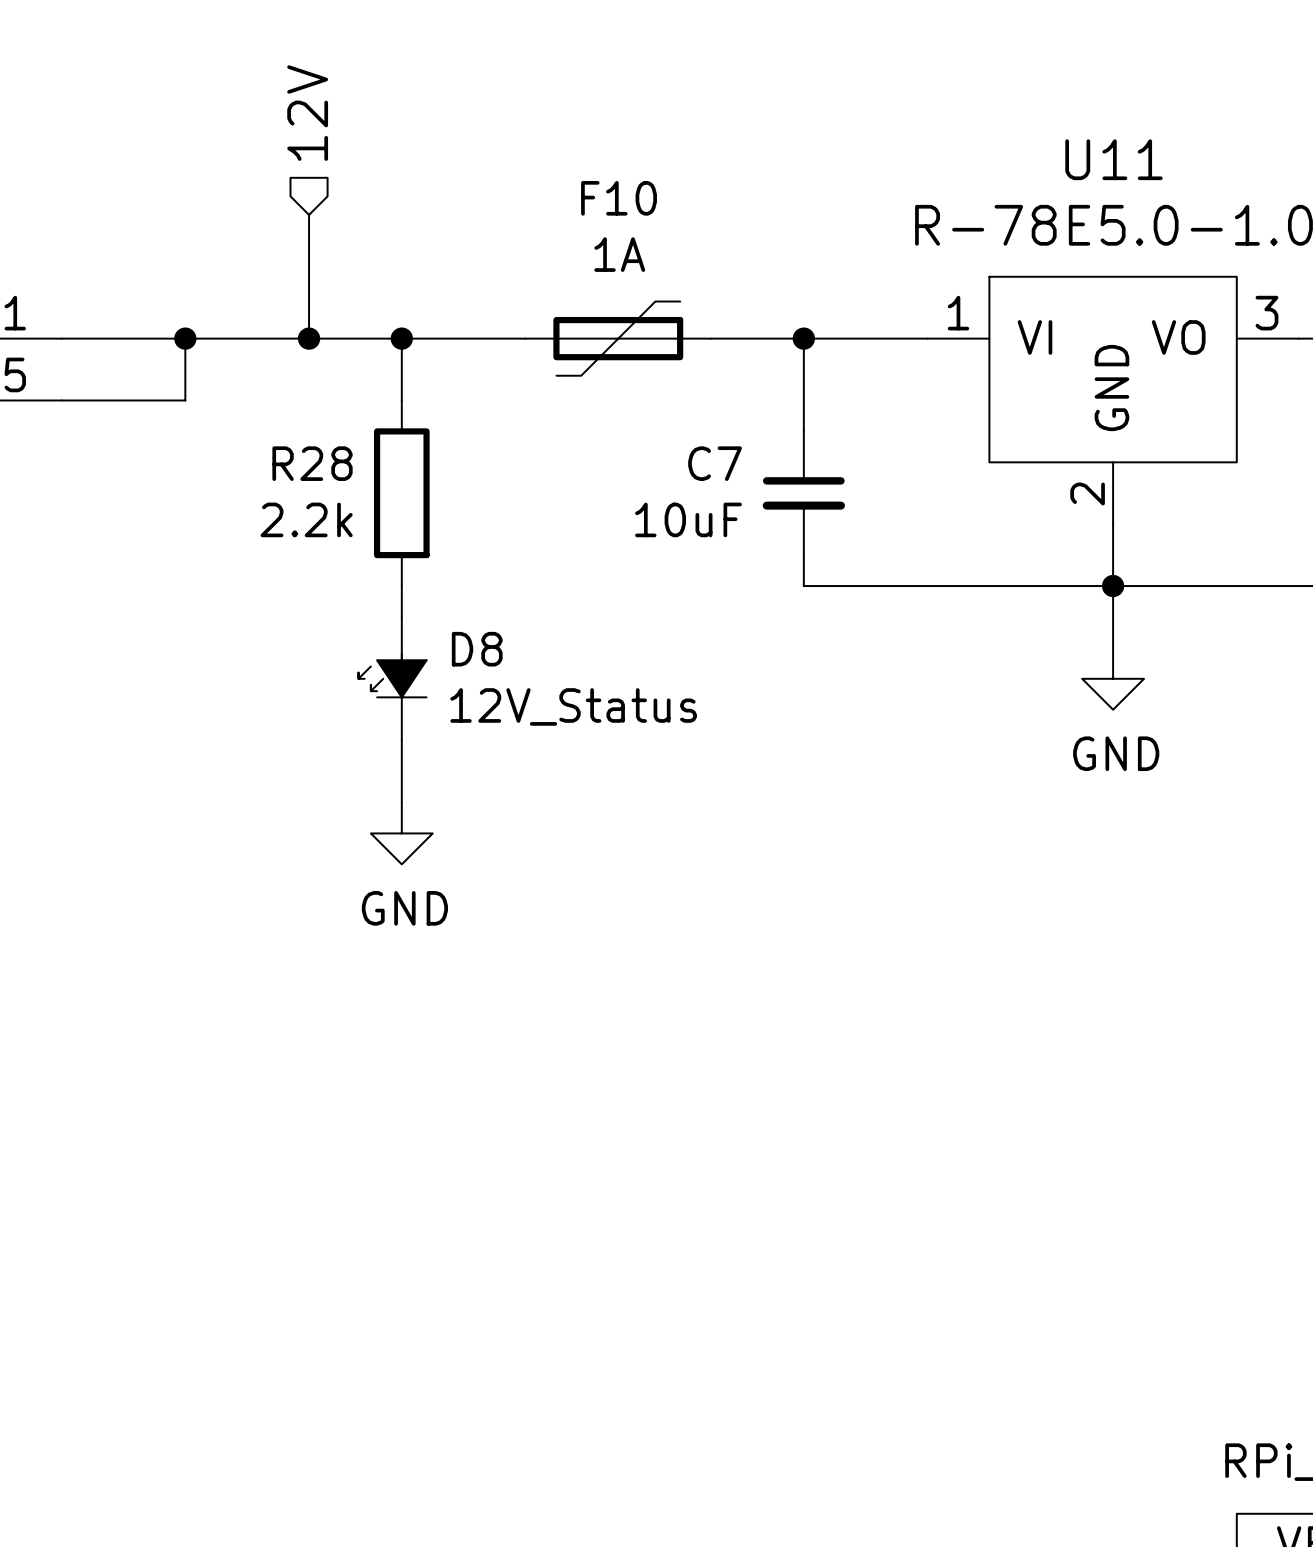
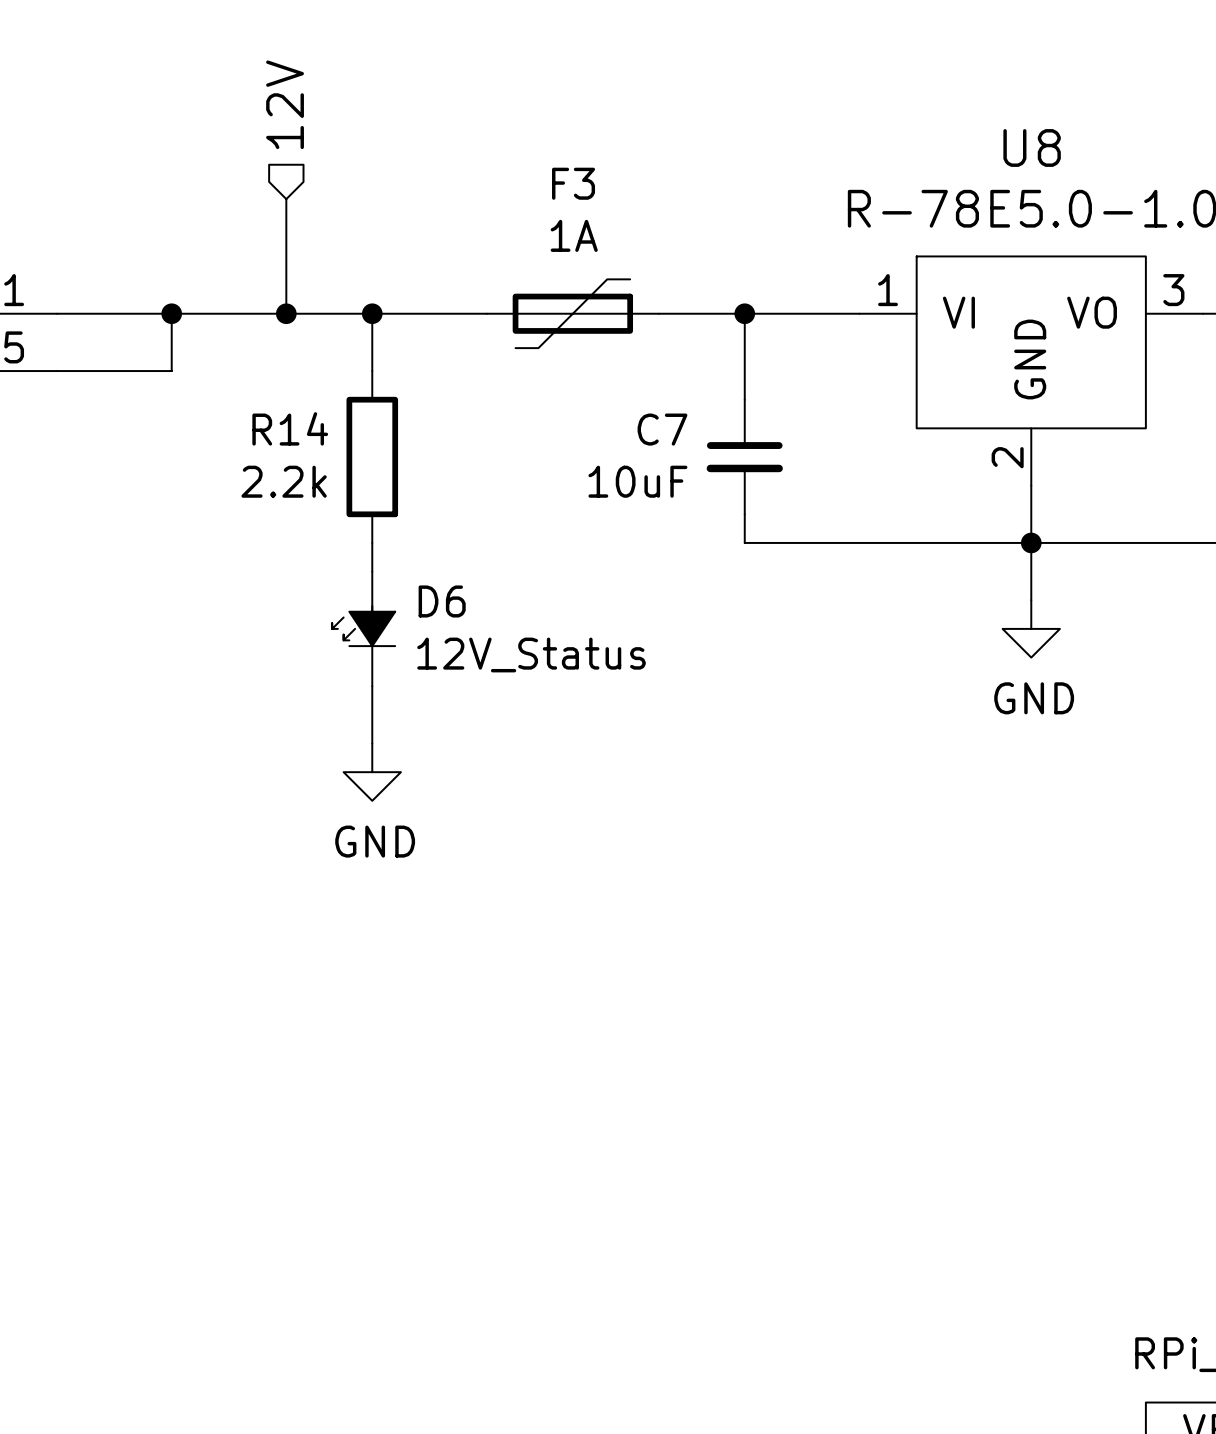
U11 name: U11 (1113, 159) -> U8 (1032, 147)
F10 name: F10 (619, 198) -> F3 (573, 183)
R28 name: R28 (312, 463) -> R14 (290, 428)
D8 name: D8 (477, 649) -> D6 (442, 601)

